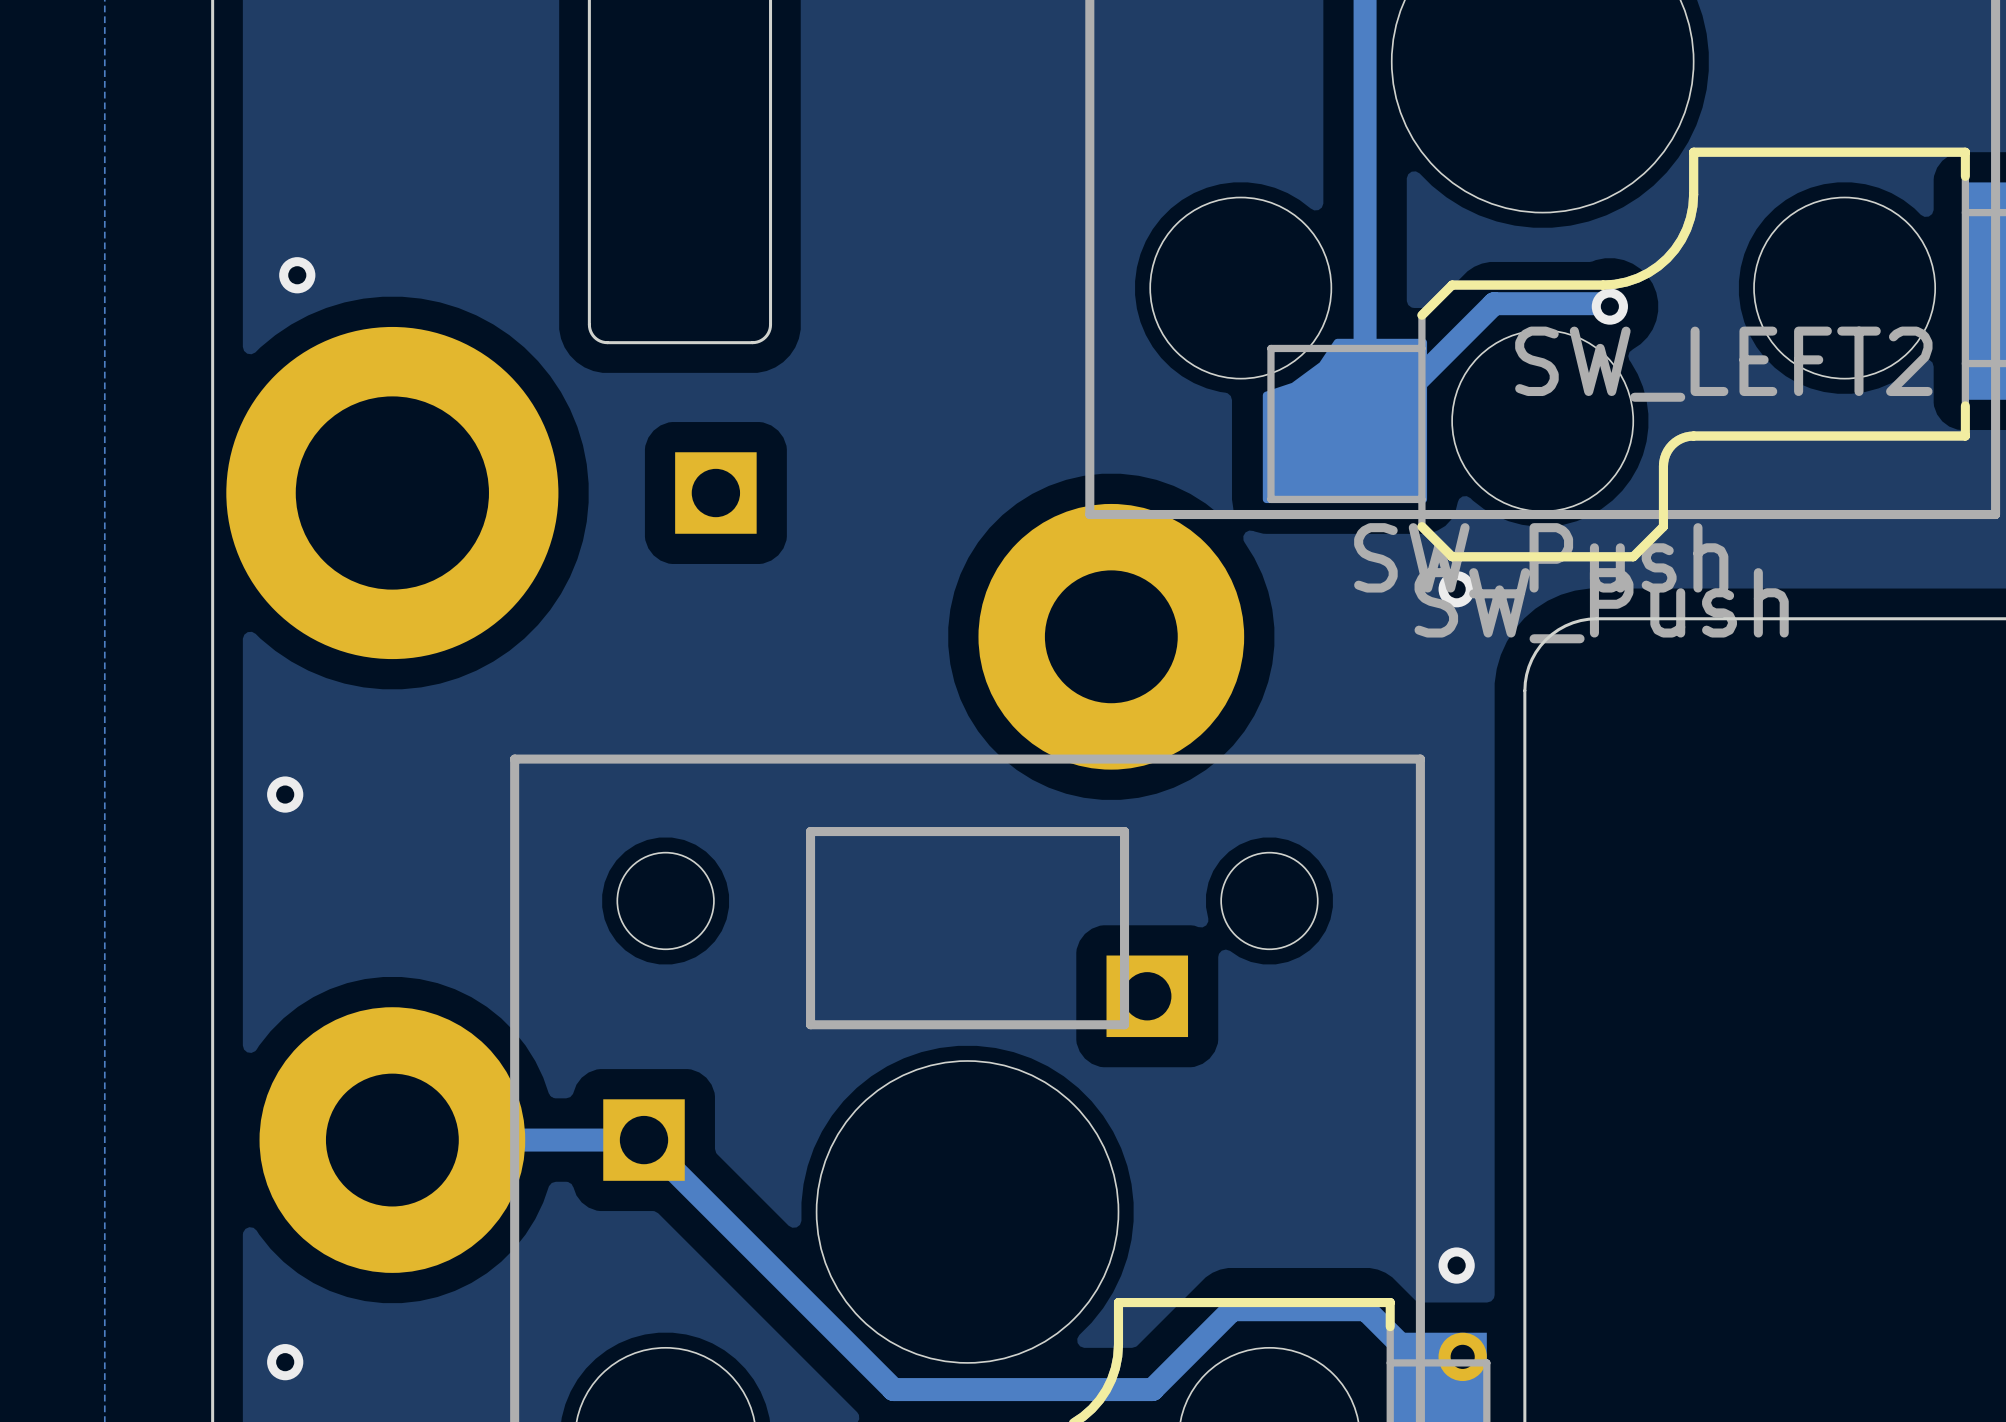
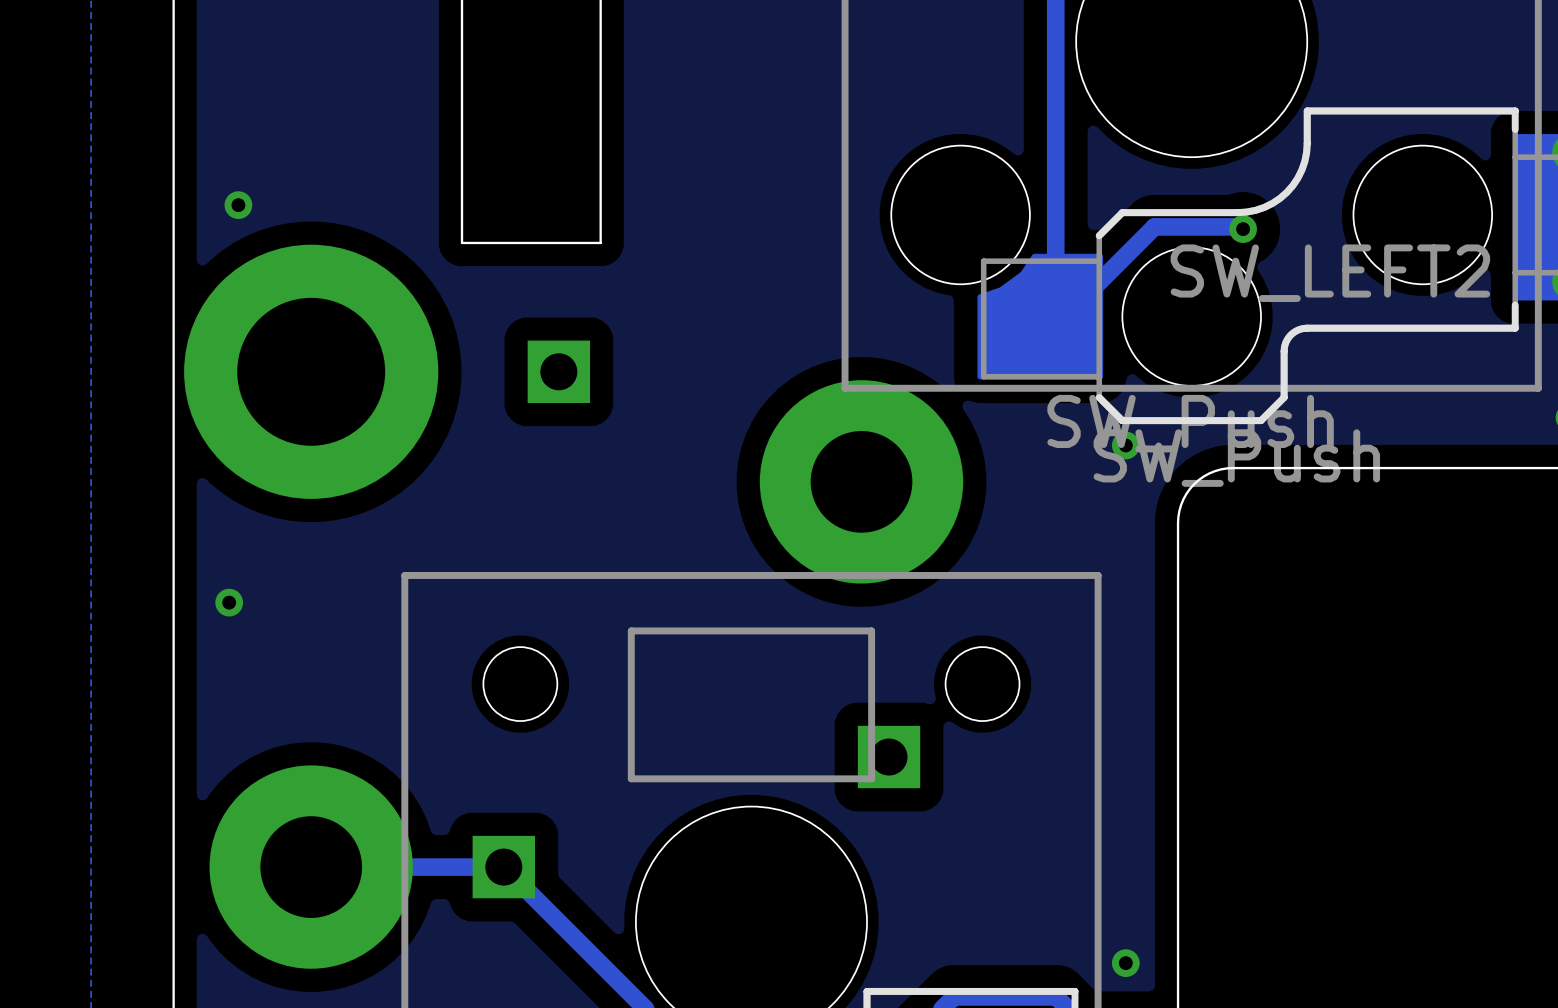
board edge: (770, 324) (765, 337) (752, 342) (605, 342) (593, 335) (589, 324) -> (600, 242) (462, 242)

